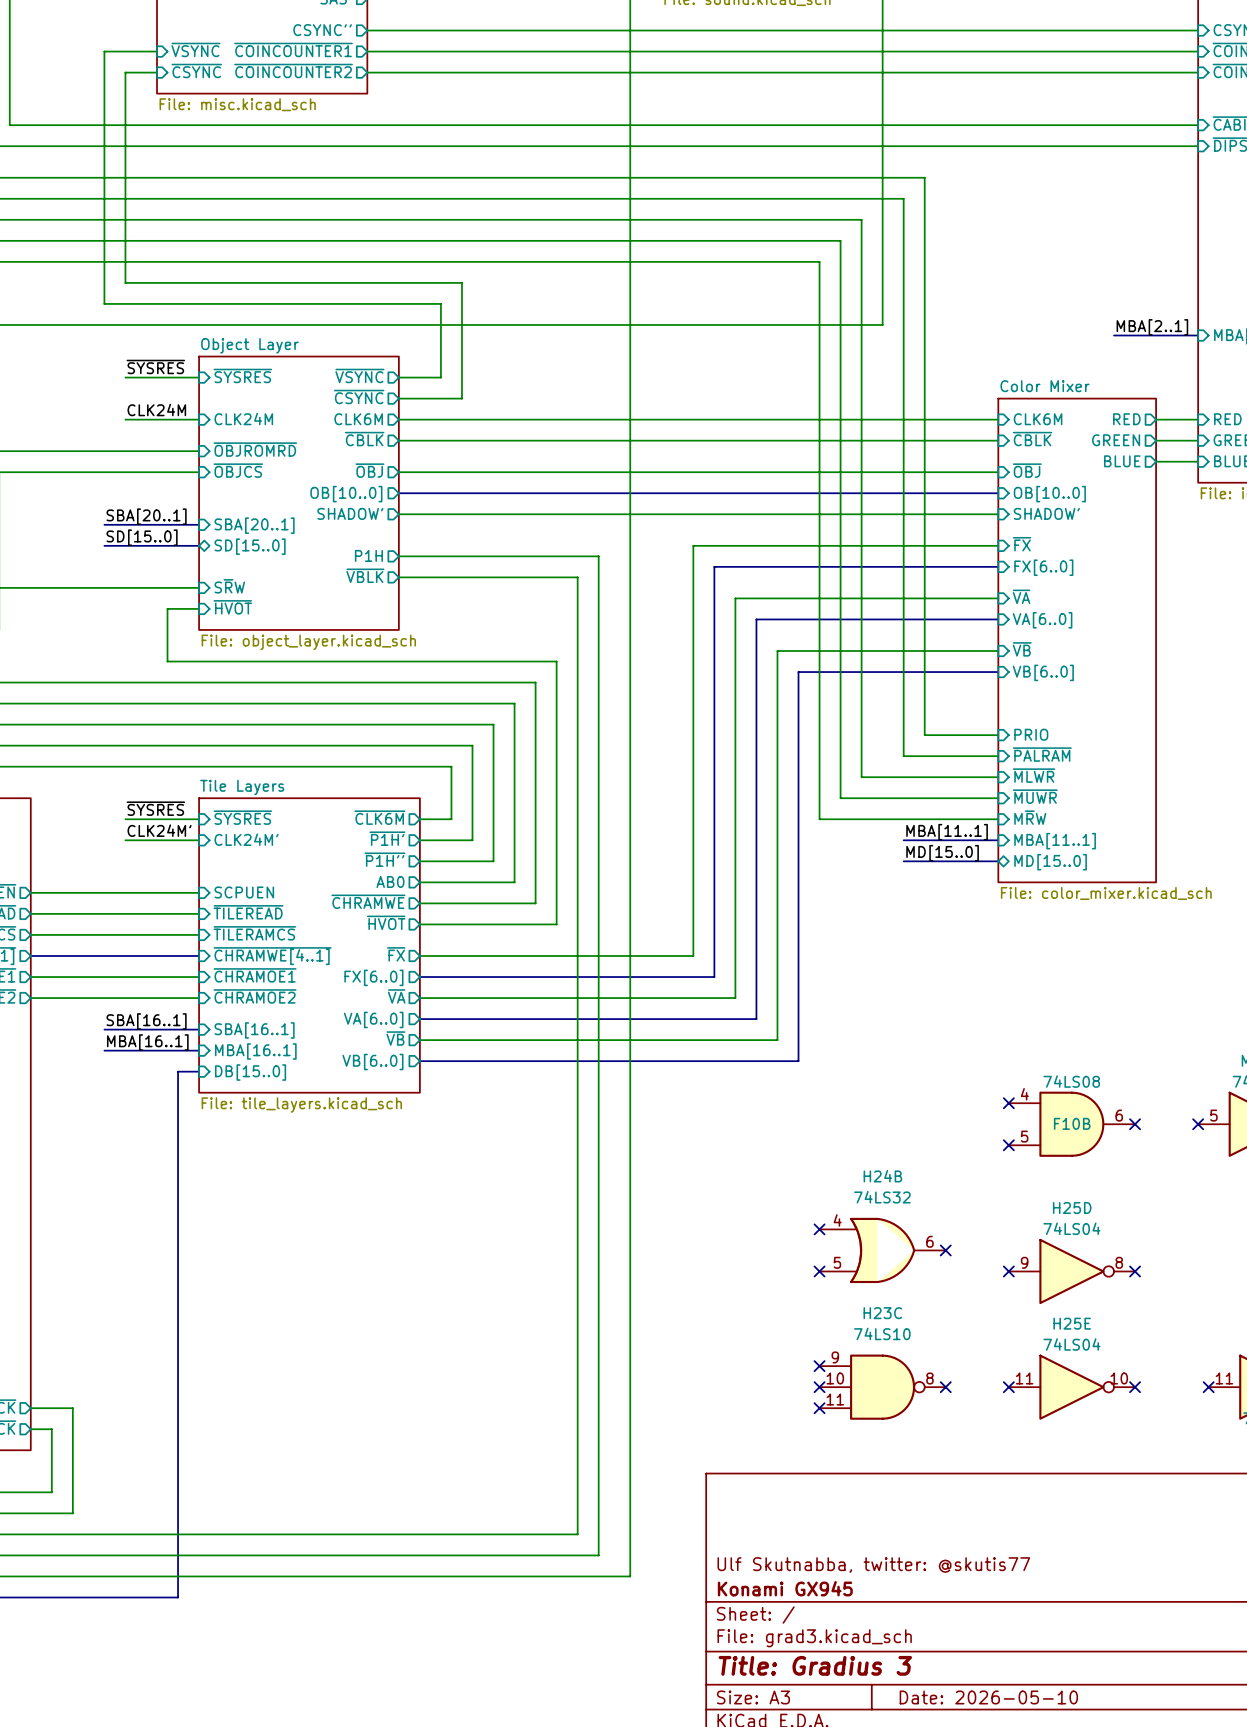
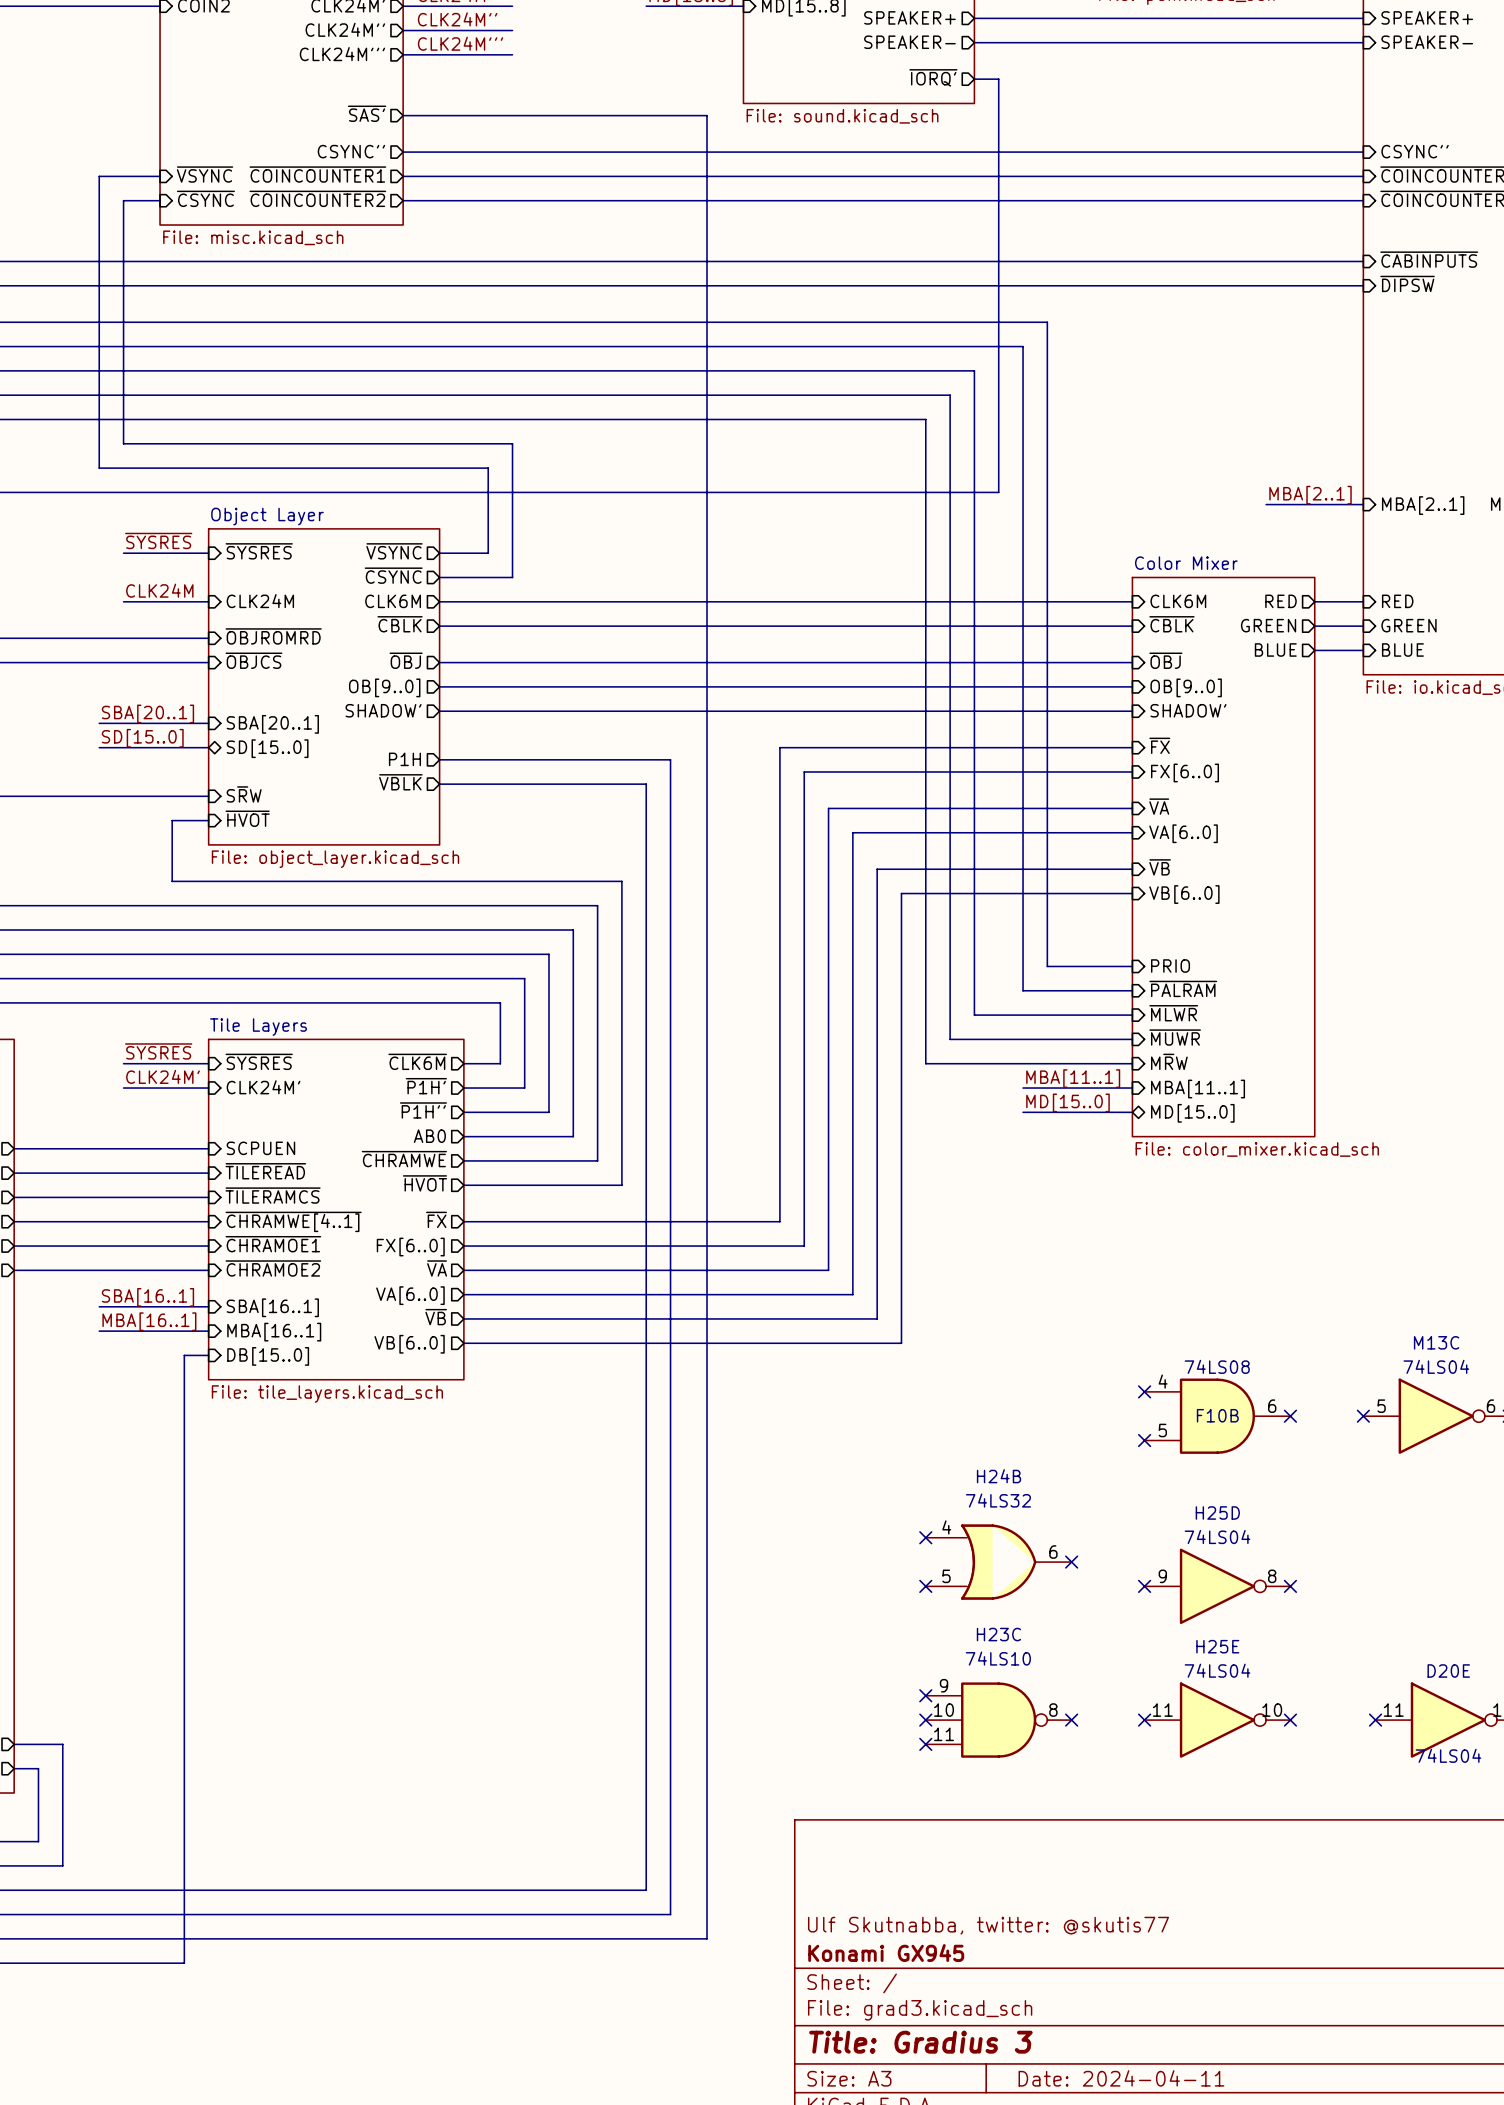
sheet pin: OB[10..0] (346, 494) -> OB[9..0] (384, 687)
sheet pin: OB[10..0] (1049, 494) -> OB[9..0] (1186, 687)
title block: Date: 2026-05-10 (988, 1697) -> Date: 2024-04-11 (1121, 2078)

